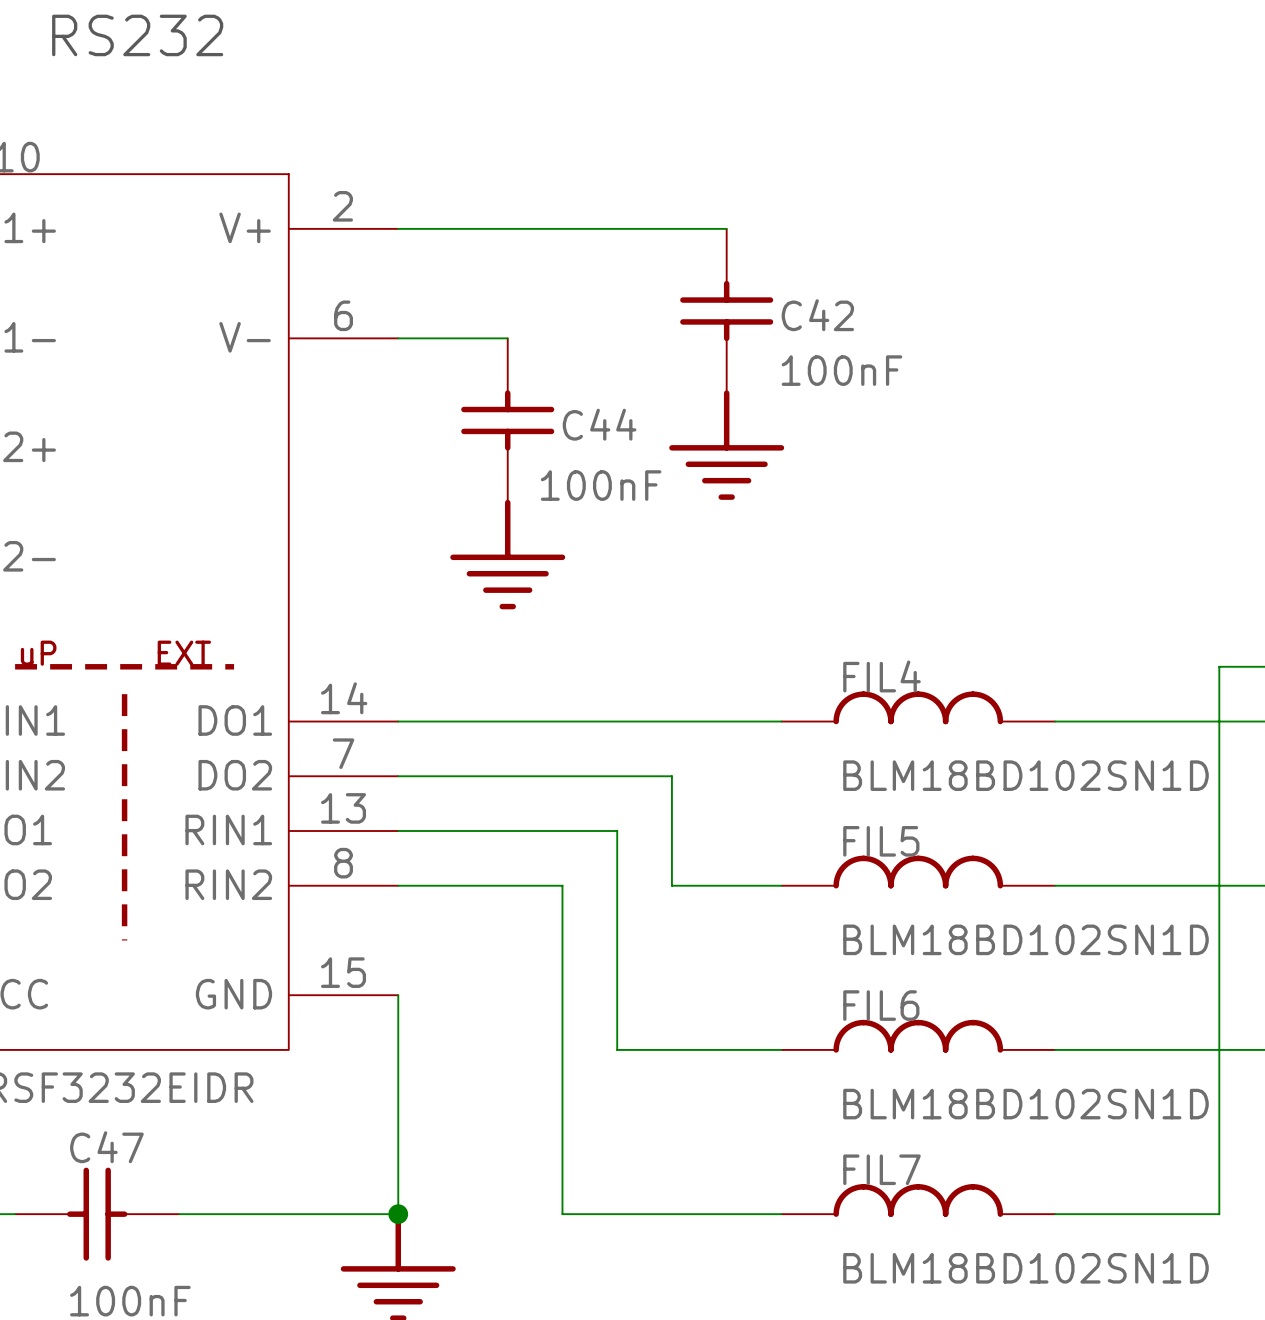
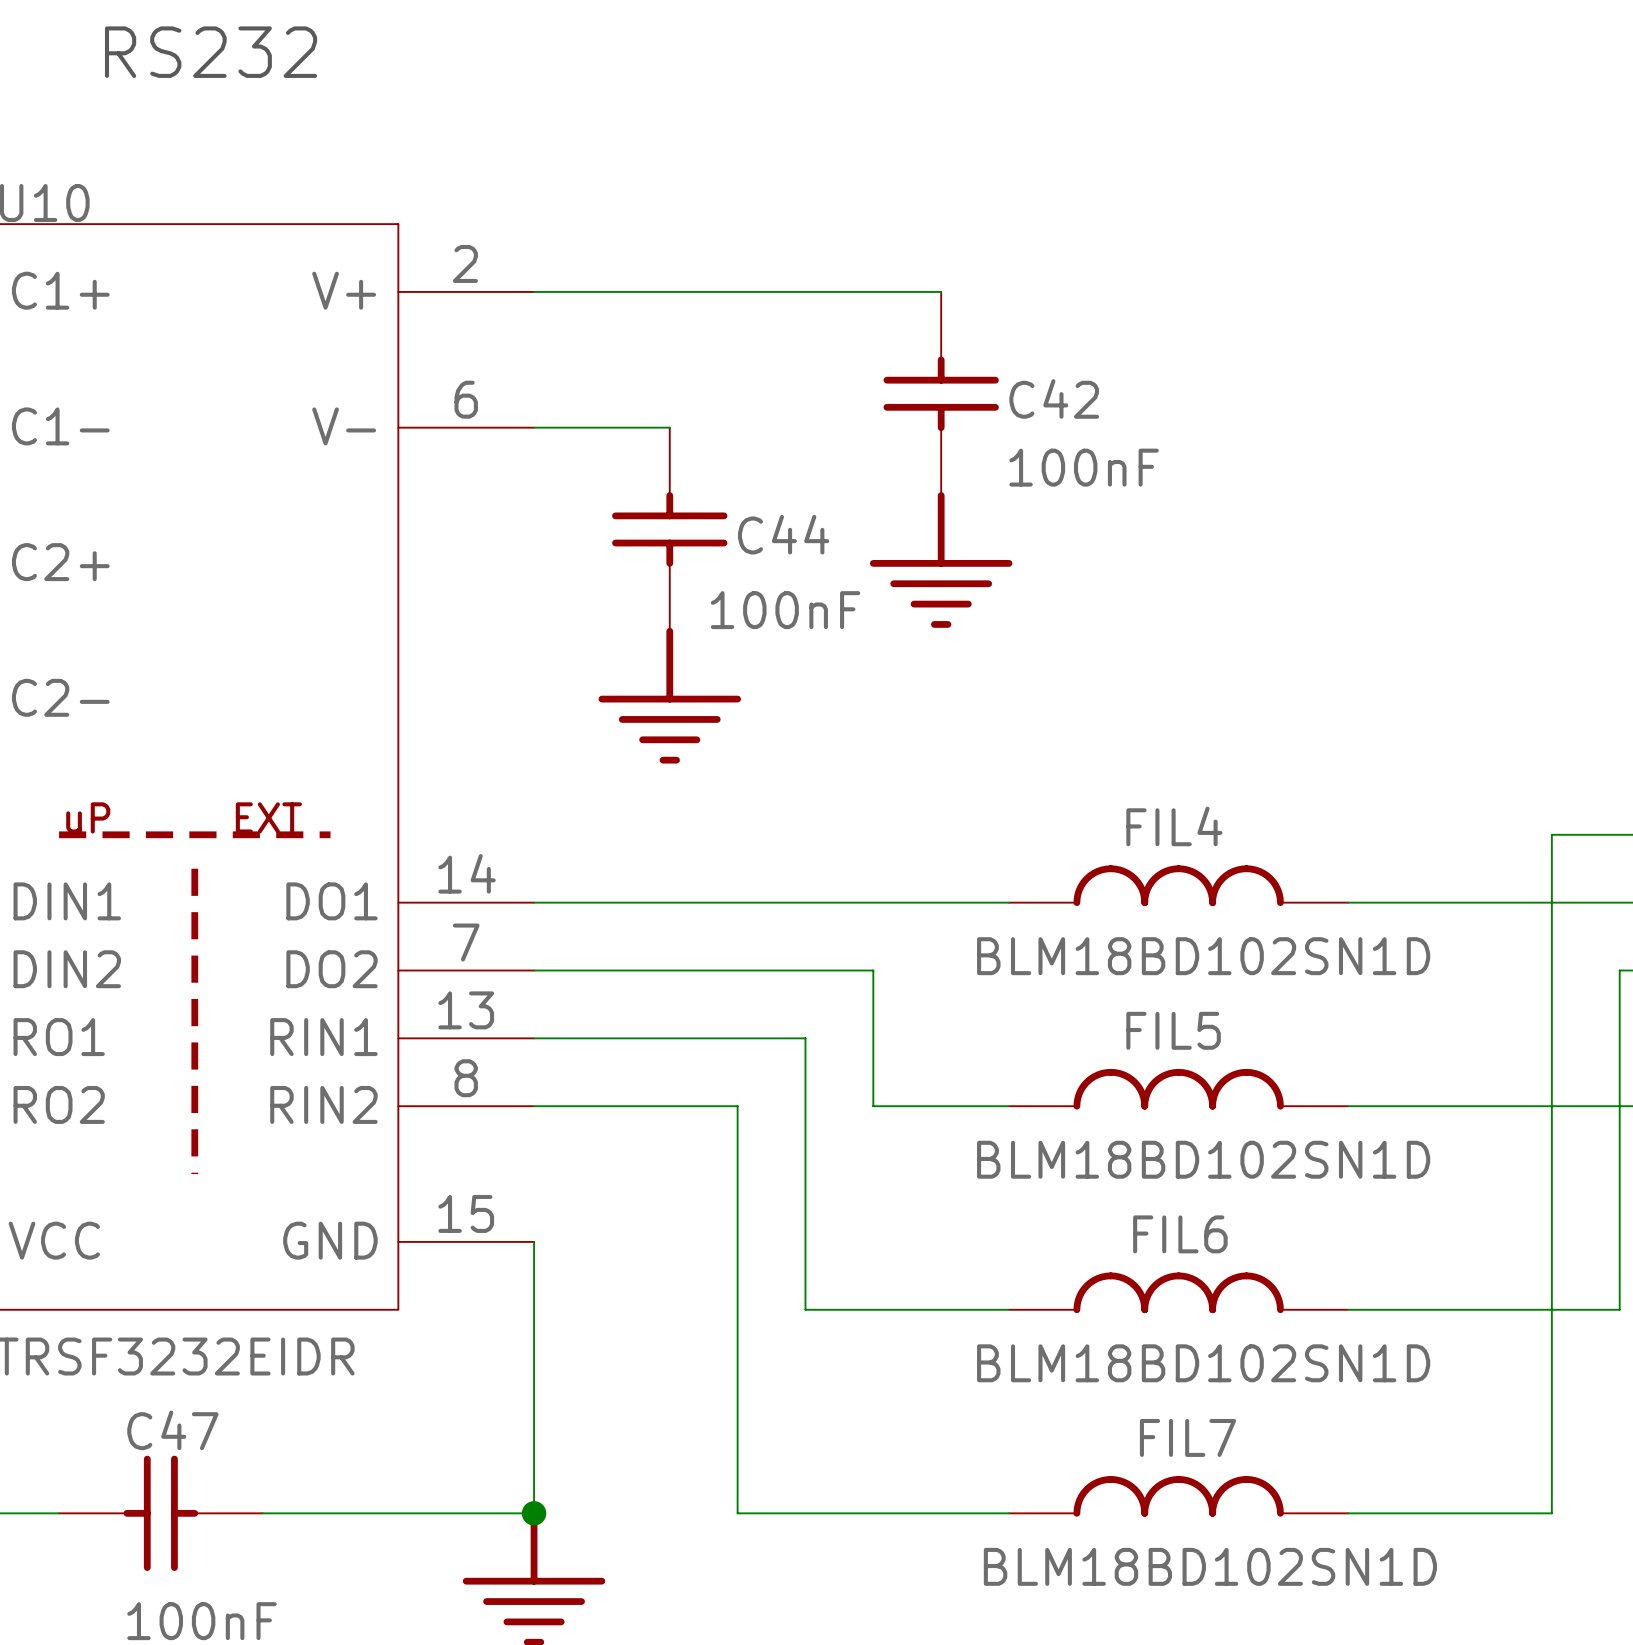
FIL4 name position: FIL4 (881, 676) -> FIL4 (1174, 826)
FIL4 value position: BLM18BD102SN1D (1025, 775) -> BLM18BD102SN1D (1203, 956)
FIL5 name position: FIL5 (881, 841) -> FIL5 (1173, 1030)
FIL5 value position: BLM18BD102SN1D (1025, 939) -> BLM18BD102SN1D (1203, 1159)
FIL6 name position: FIL6 (881, 1005) -> FIL6 (1180, 1234)
FIL6 value position: BLM18BD102SN1D (1025, 1104) -> BLM18BD102SN1D (1203, 1363)
FIL7 name position: FIL7 (881, 1169) -> FIL7 (1187, 1437)
FIL7 value position: BLM18BD102SN1D (1025, 1268) -> BLM18BD102SN1D (1210, 1566)

